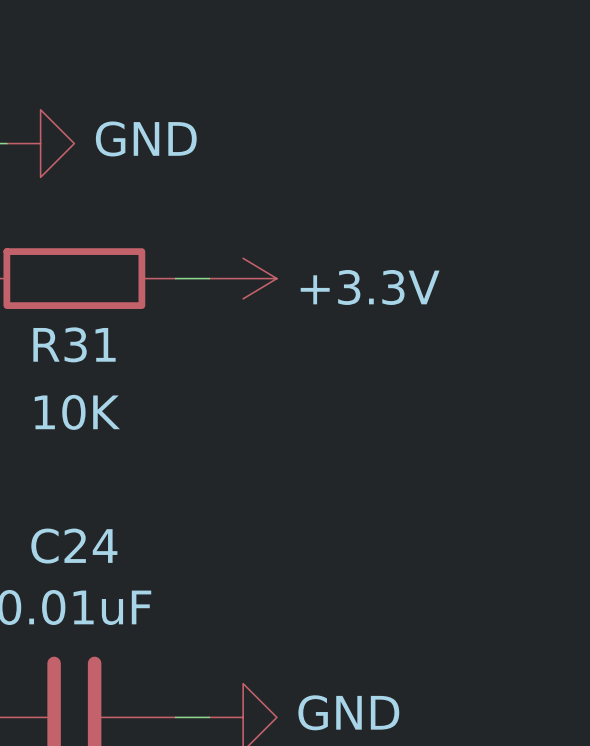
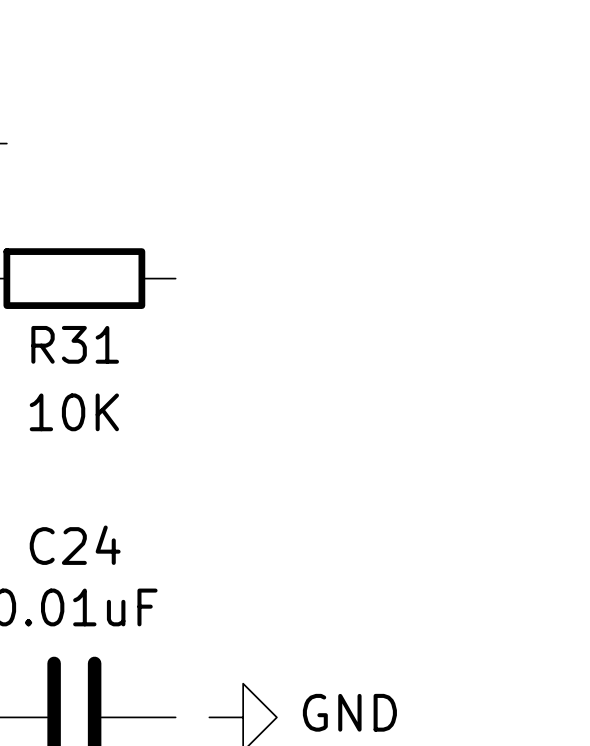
power symbol: GND (40, 143) -> none
wire: (175, 278) (209, 278) -> none
power symbol: +3.3V (243, 278) -> none
wire: (175, 717) (209, 717) -> none

